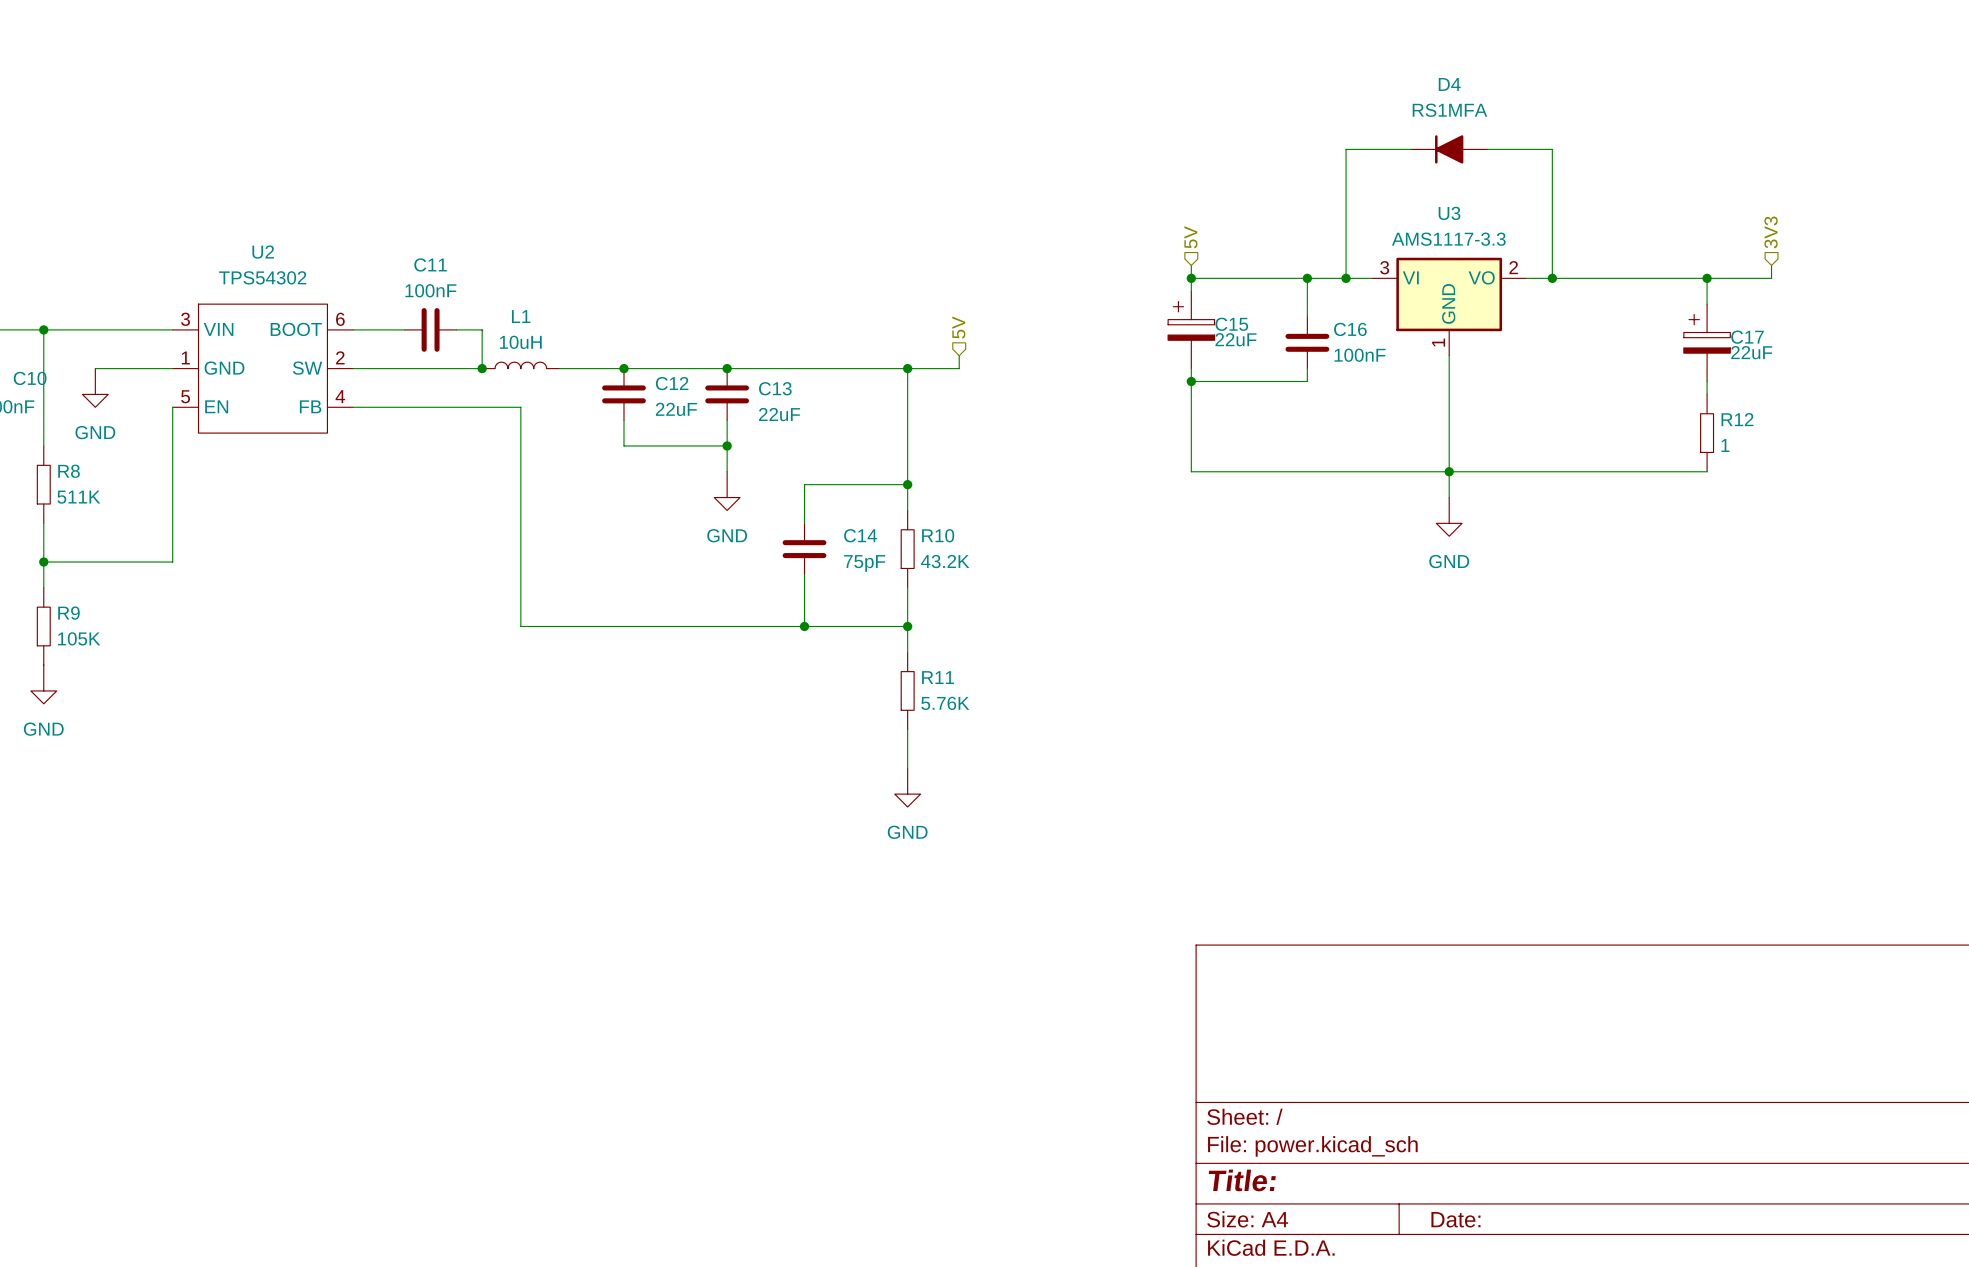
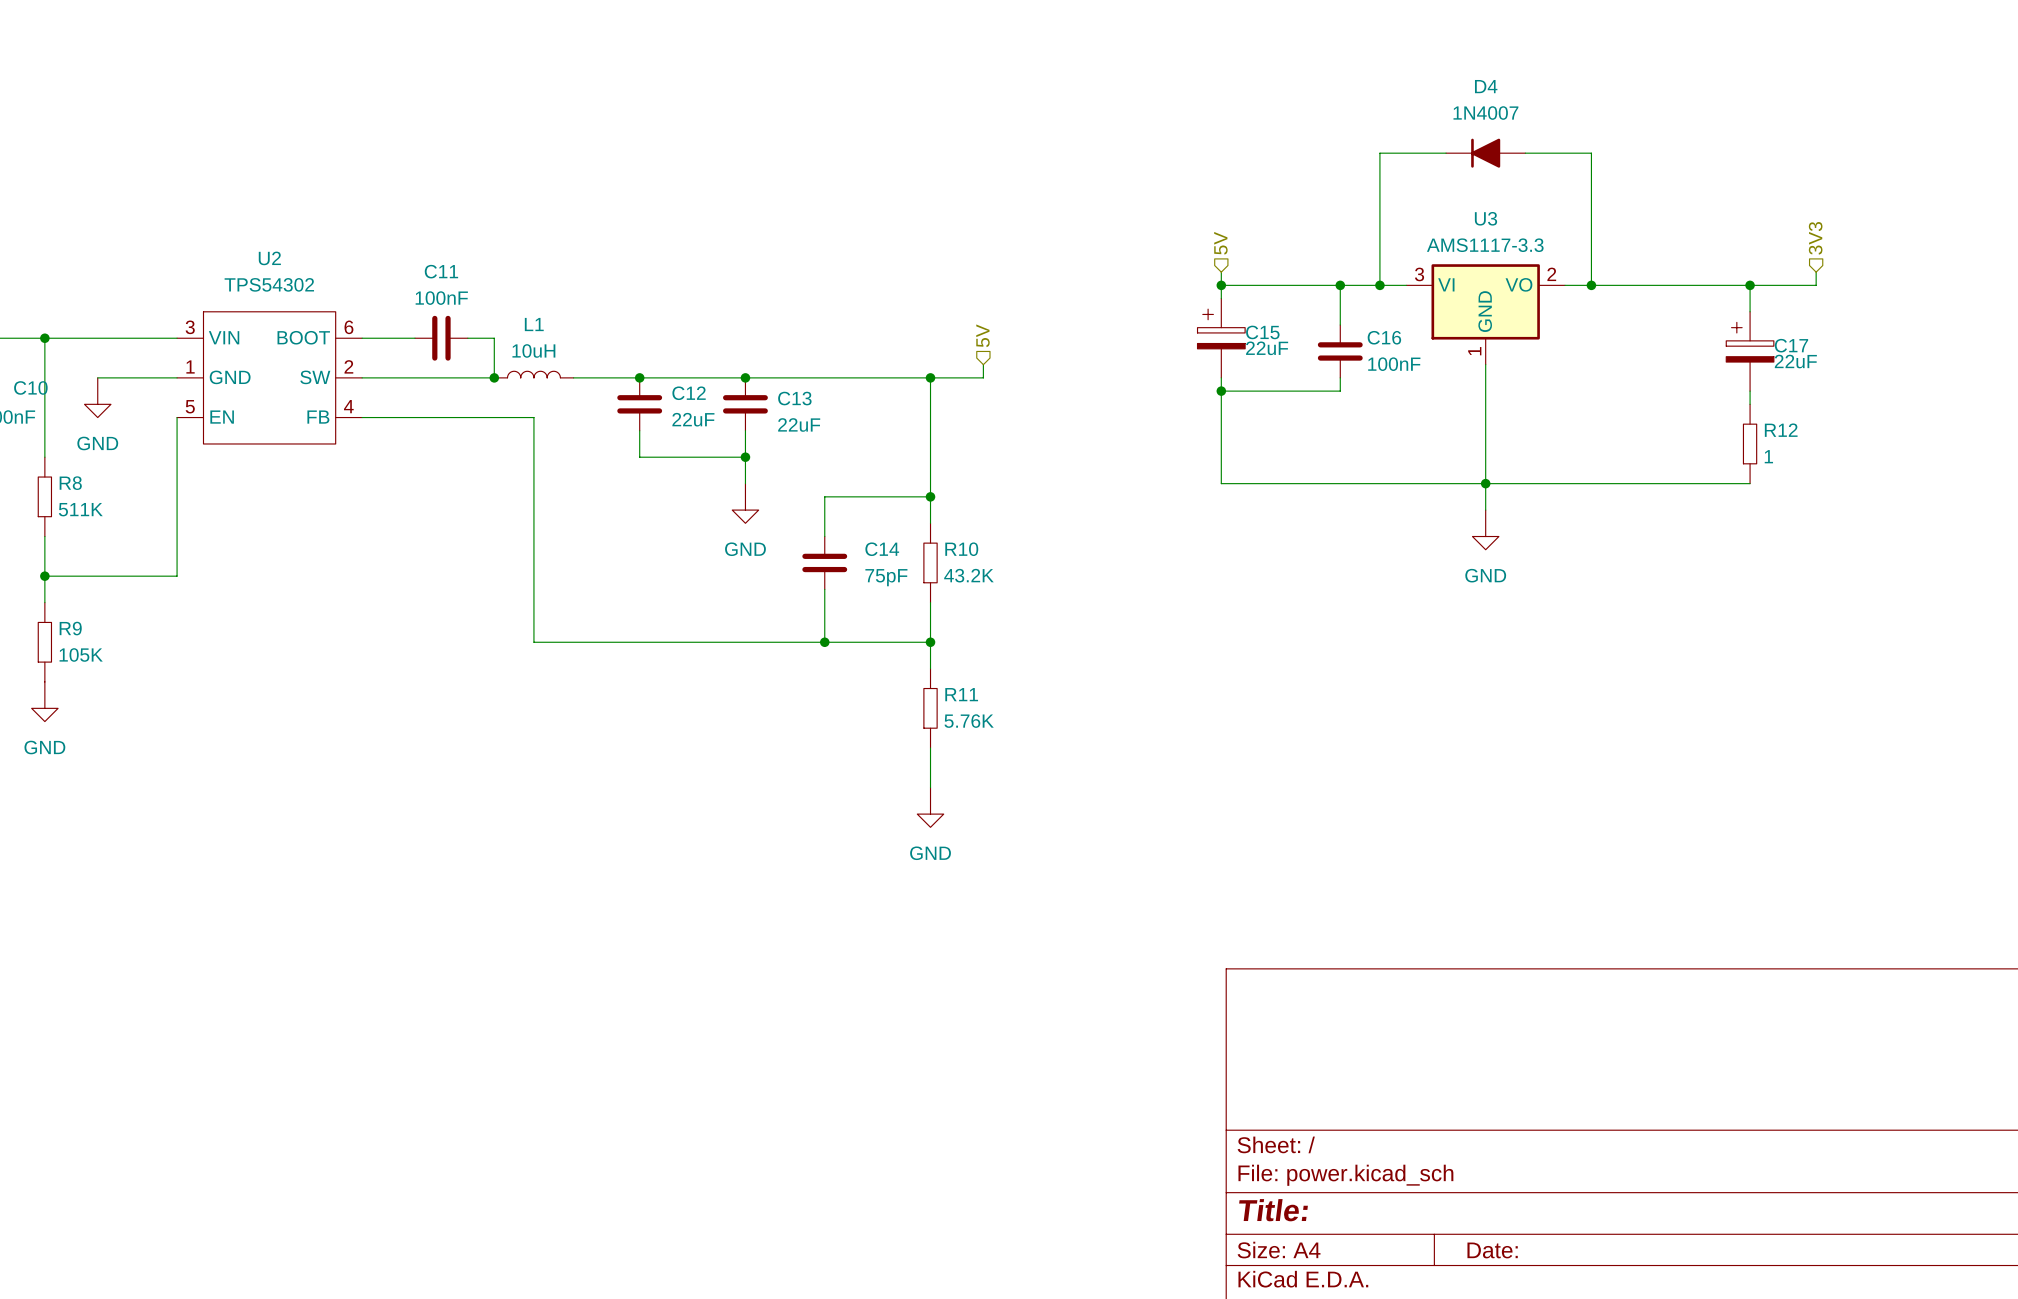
D4 value: RS1MFA (1449, 110) -> 1N4007 (1485, 113)

